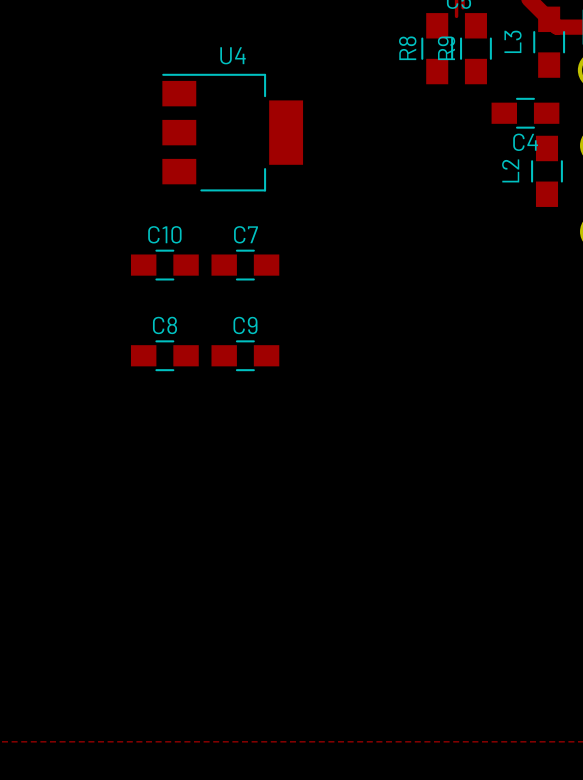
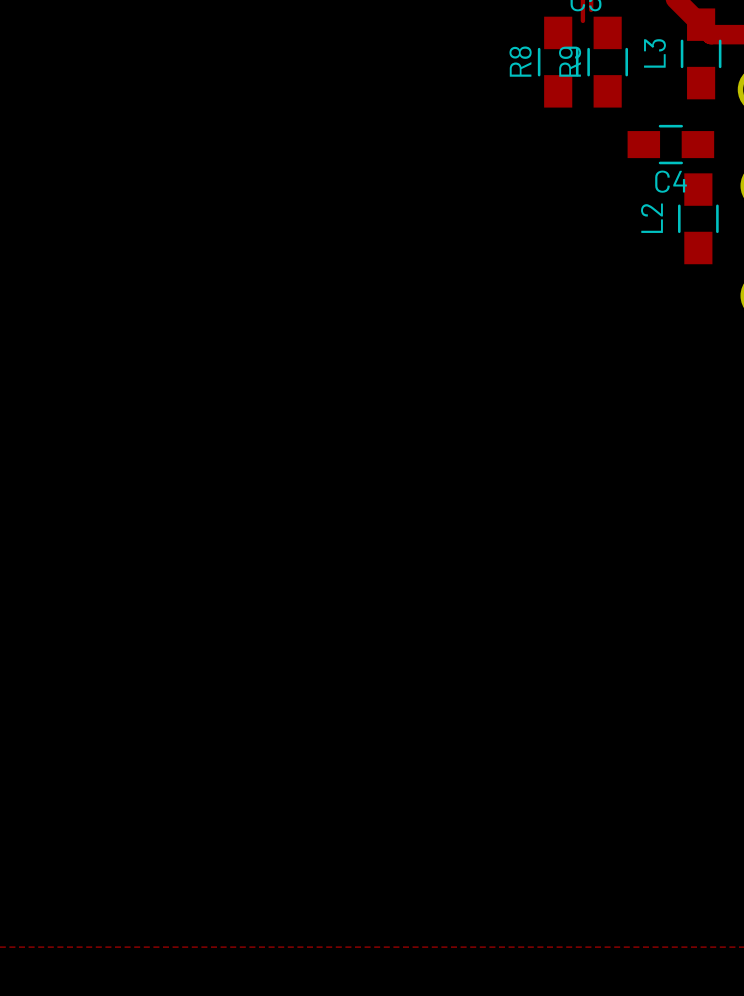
U4: (232, 132) -> none
C10: (164, 265) -> none
C7: (245, 265) -> none
C8: (164, 355) -> none
C9: (245, 355) -> none

